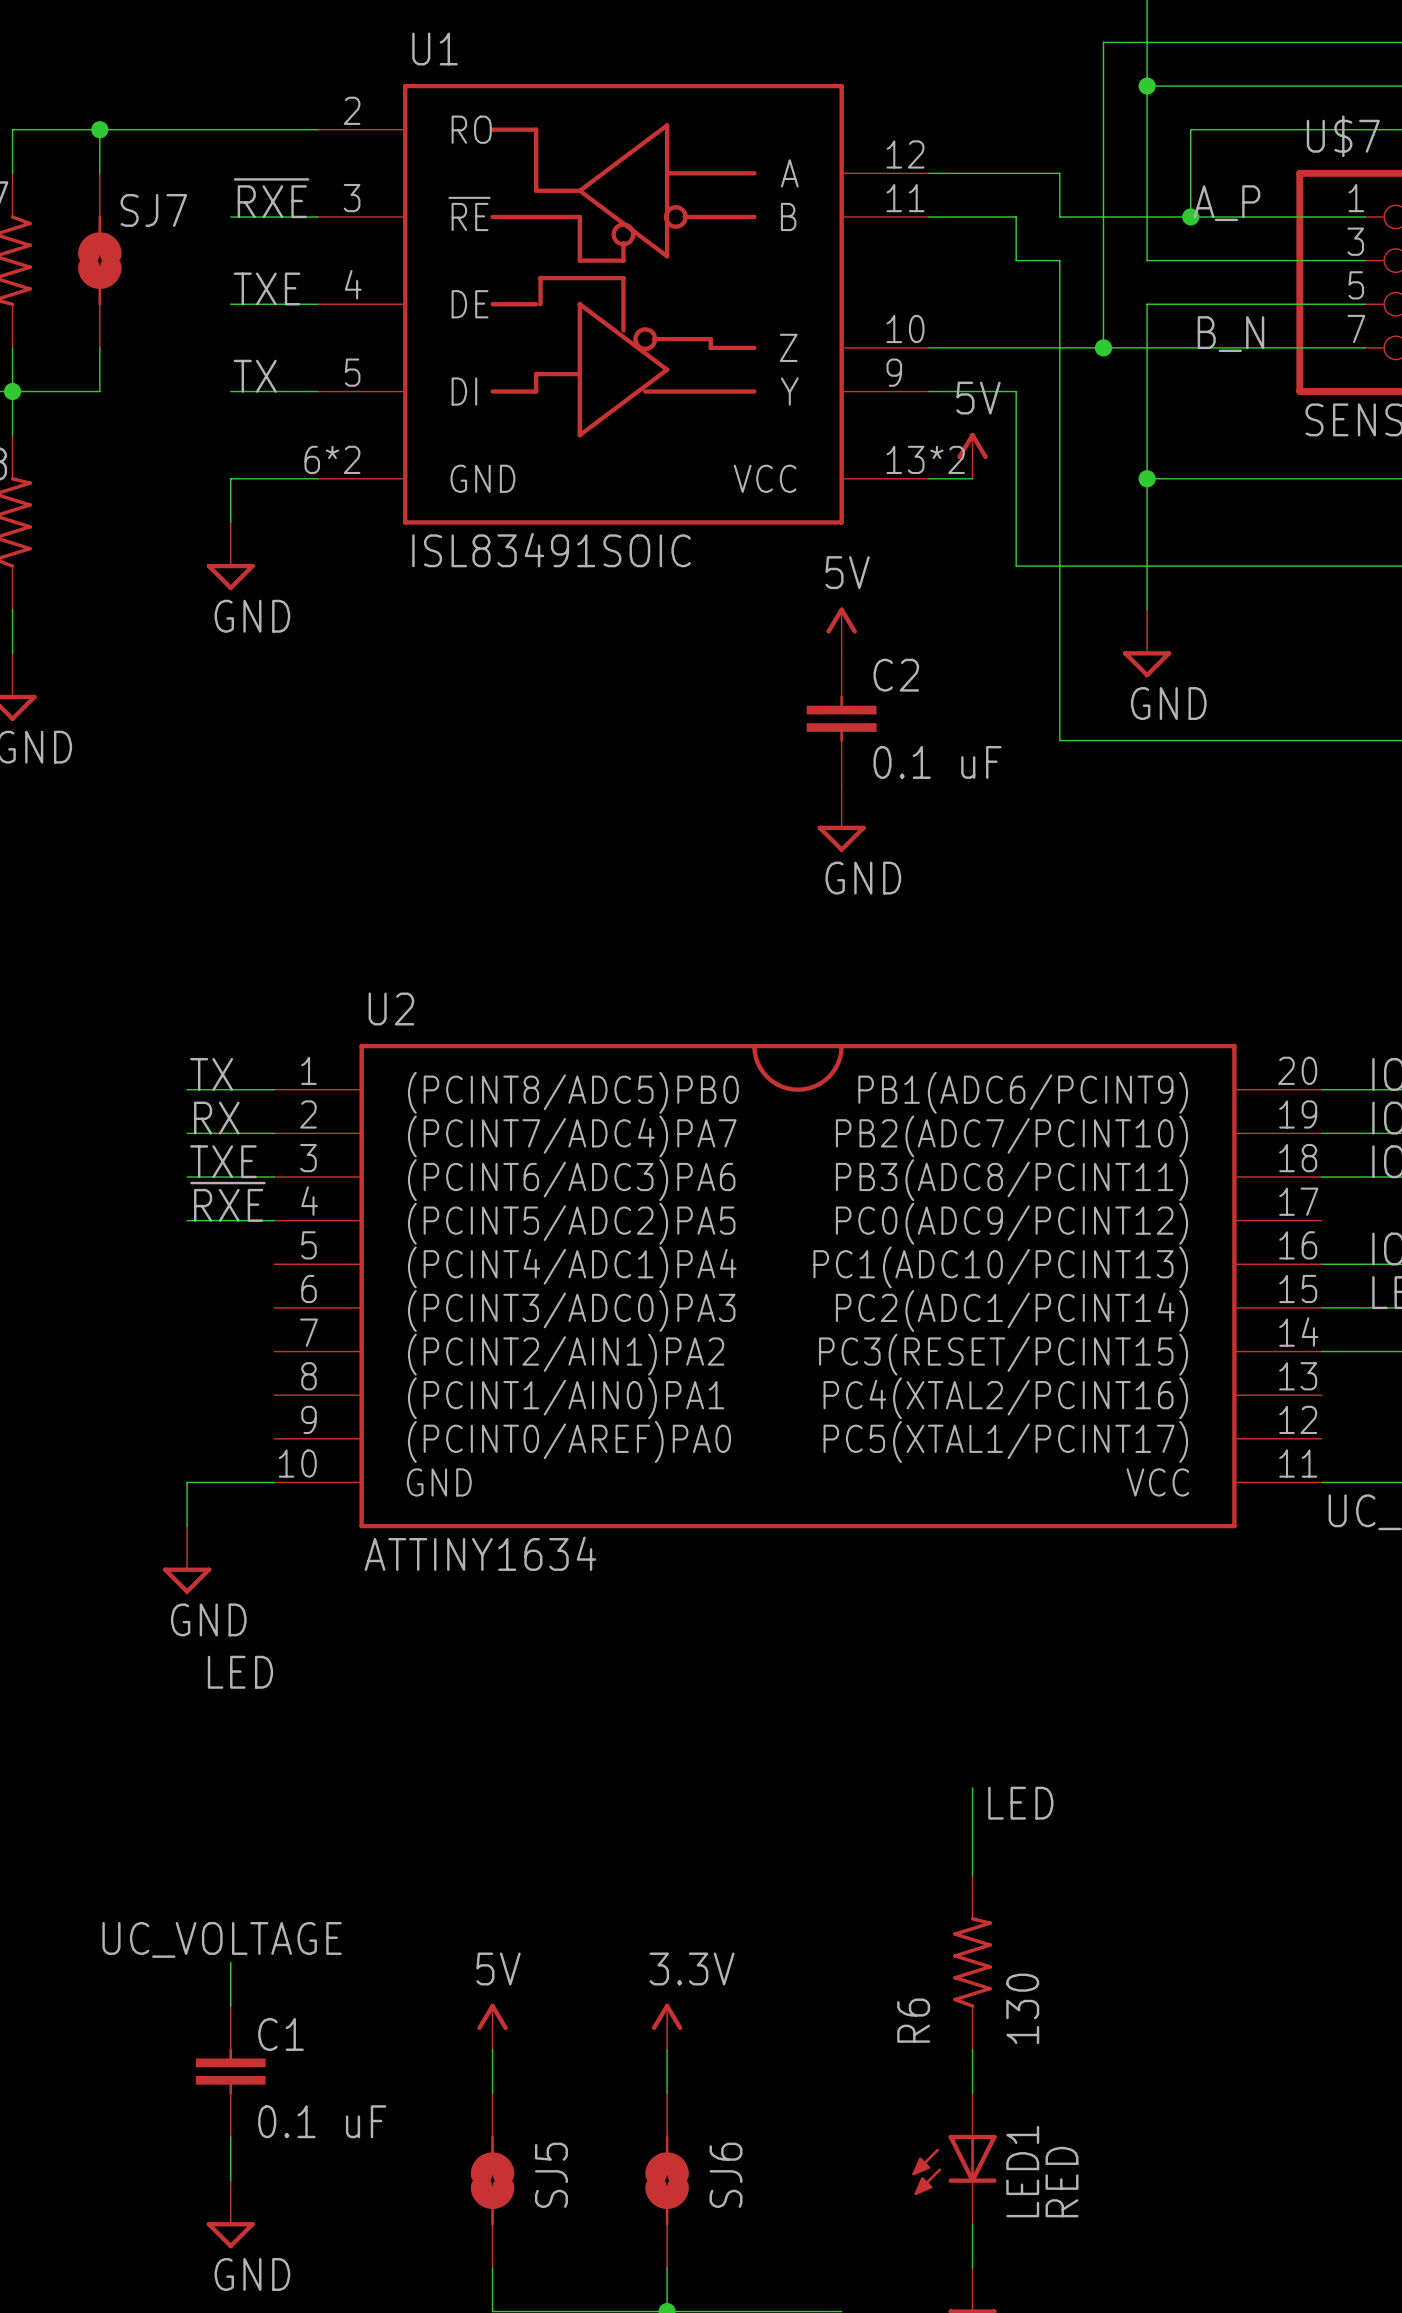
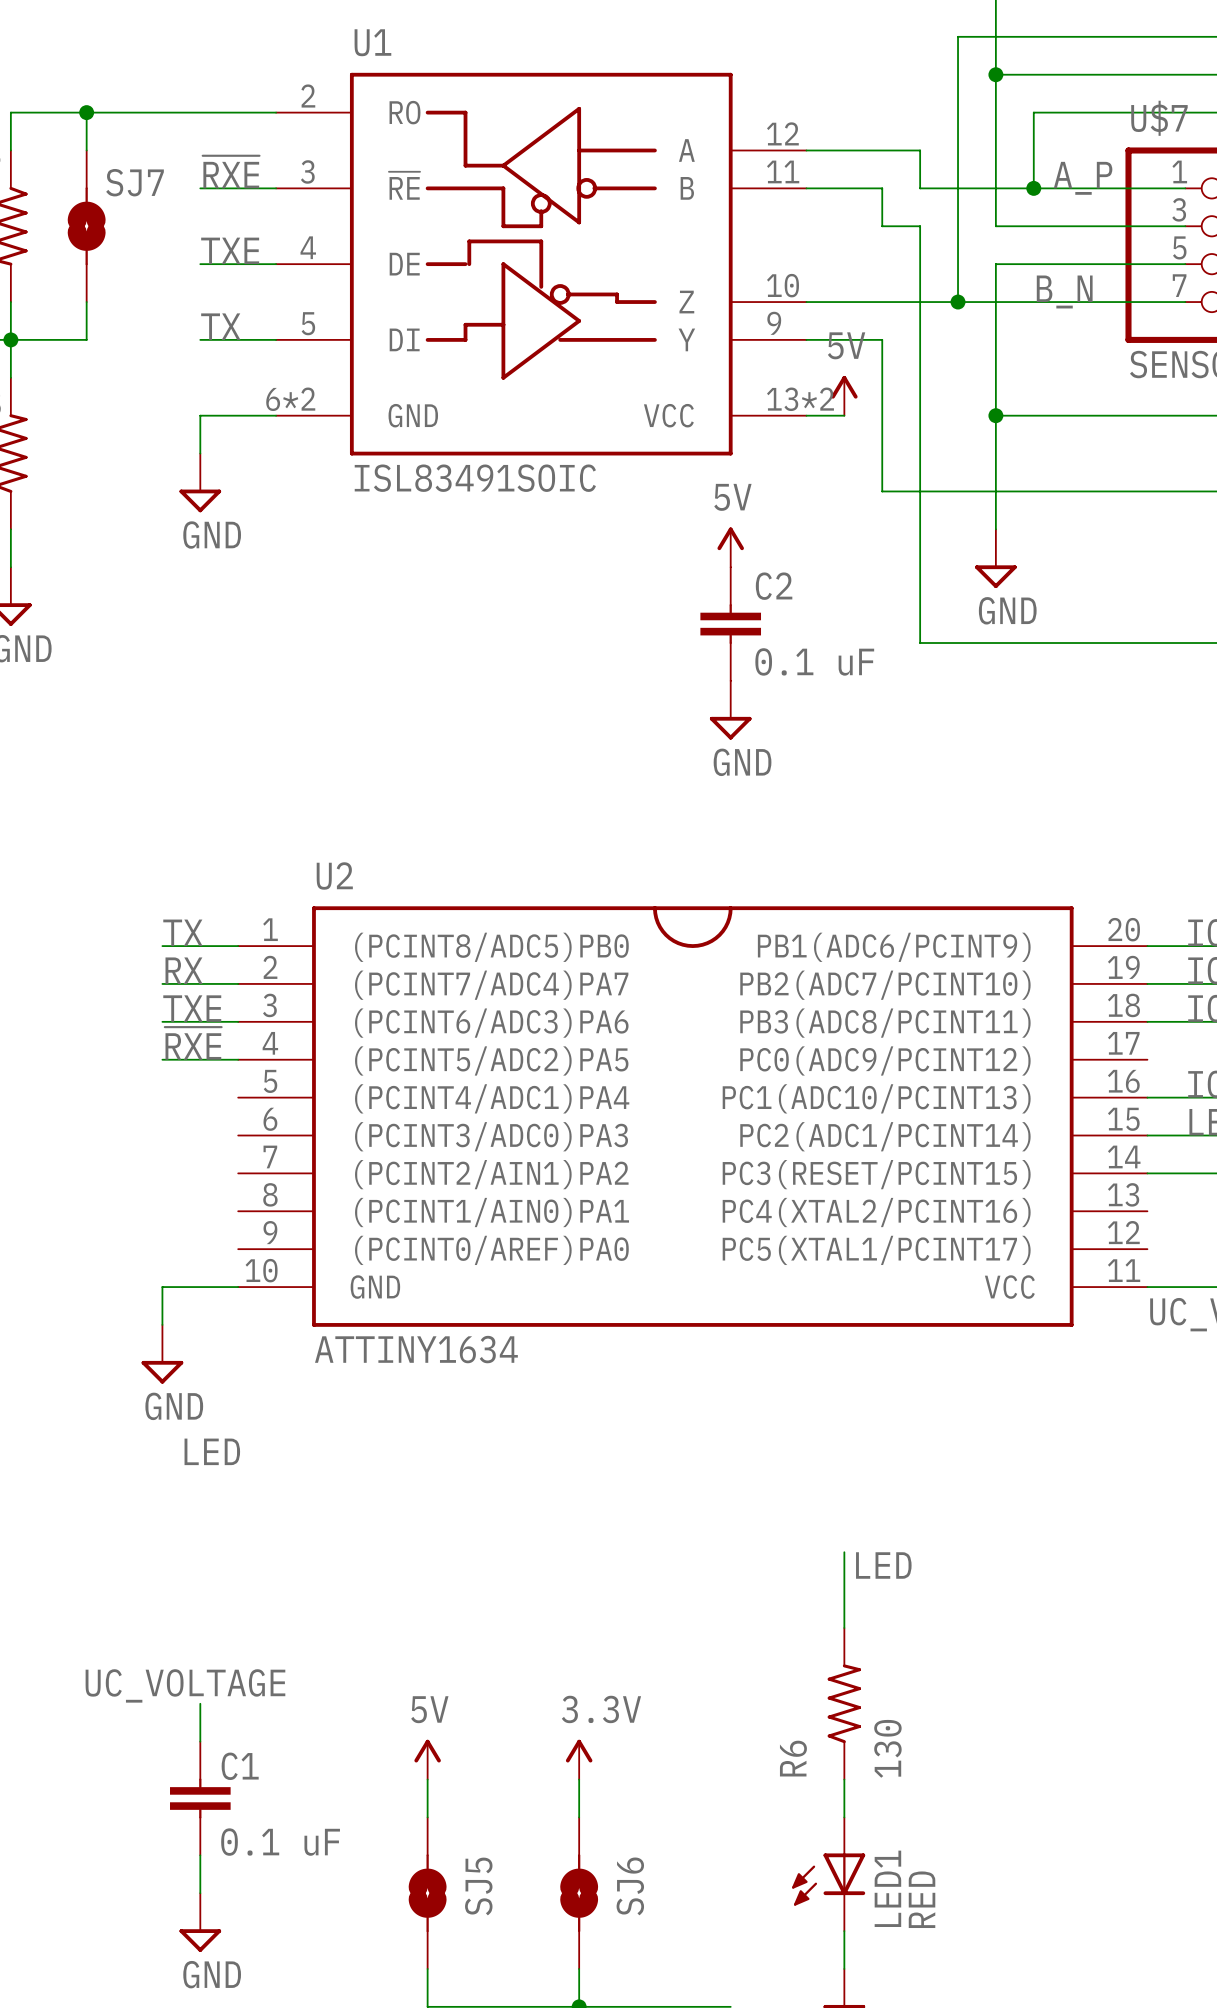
label position: A_P (1227, 203) -> A_P (1083, 178)

